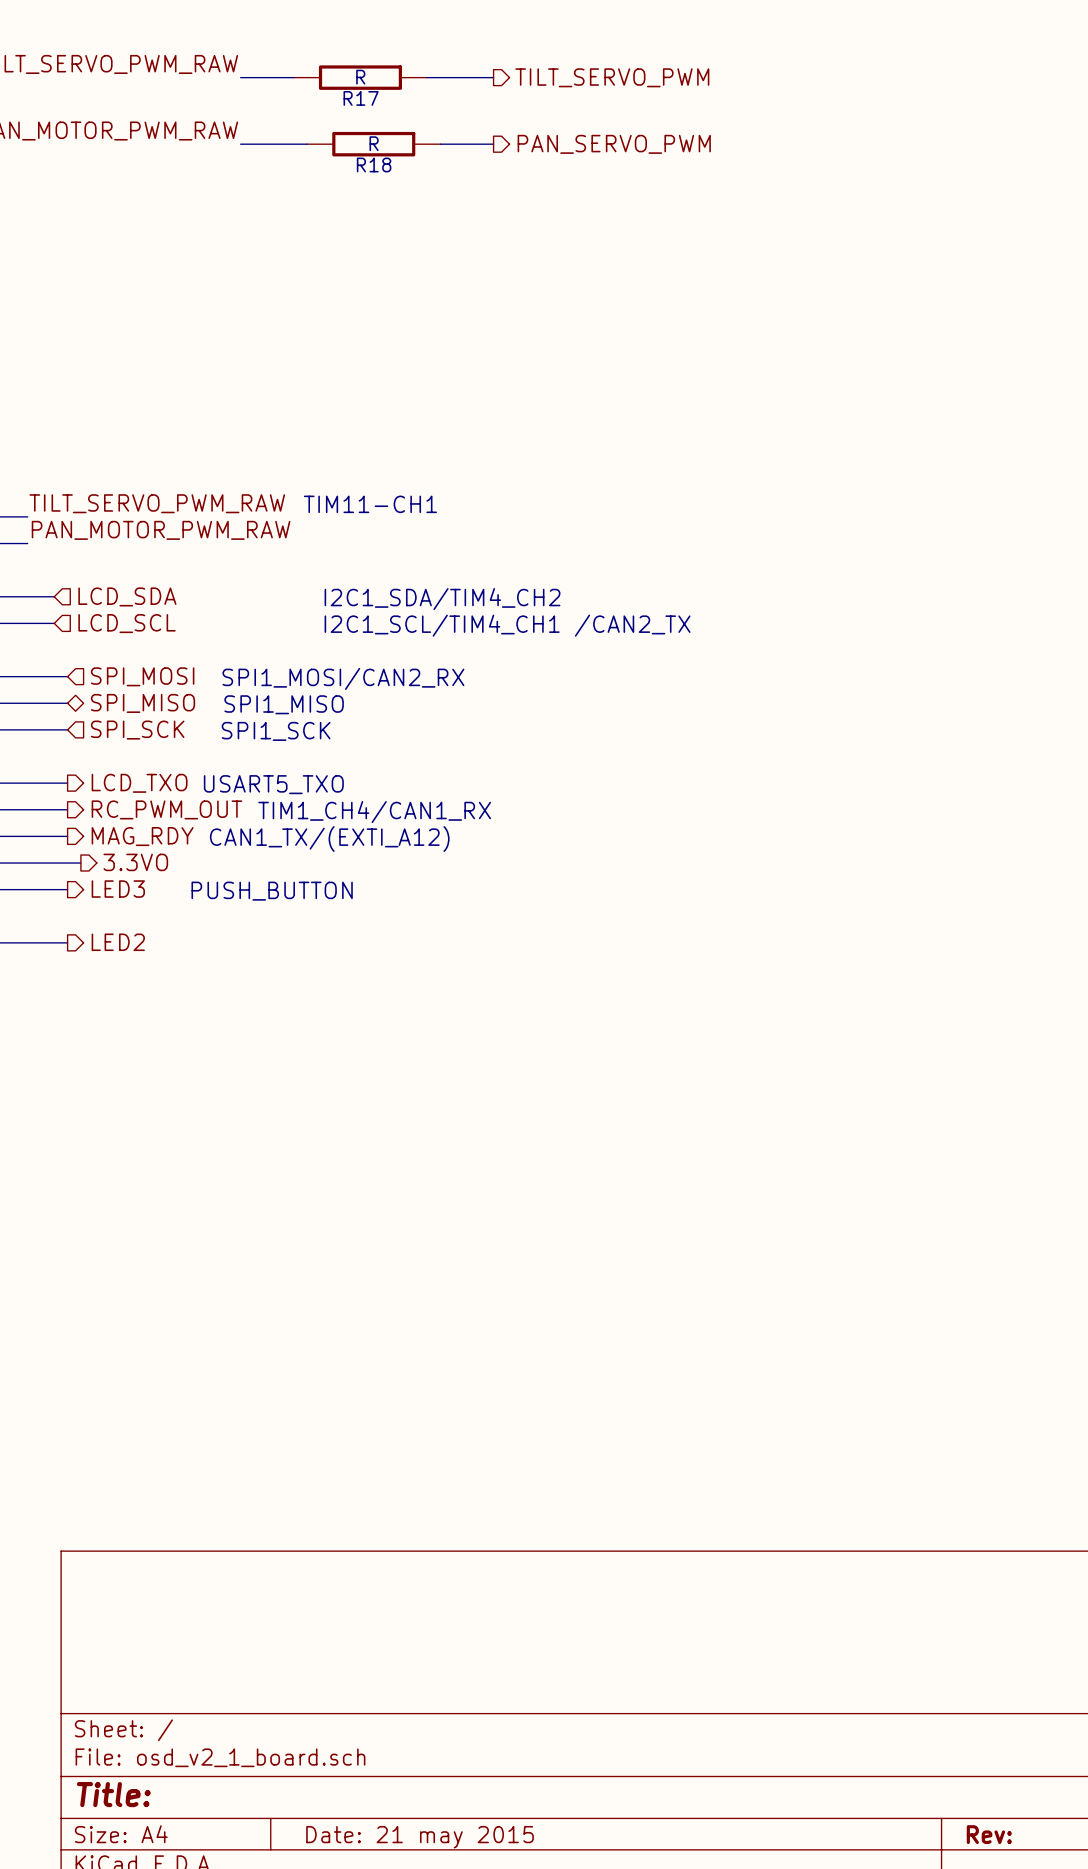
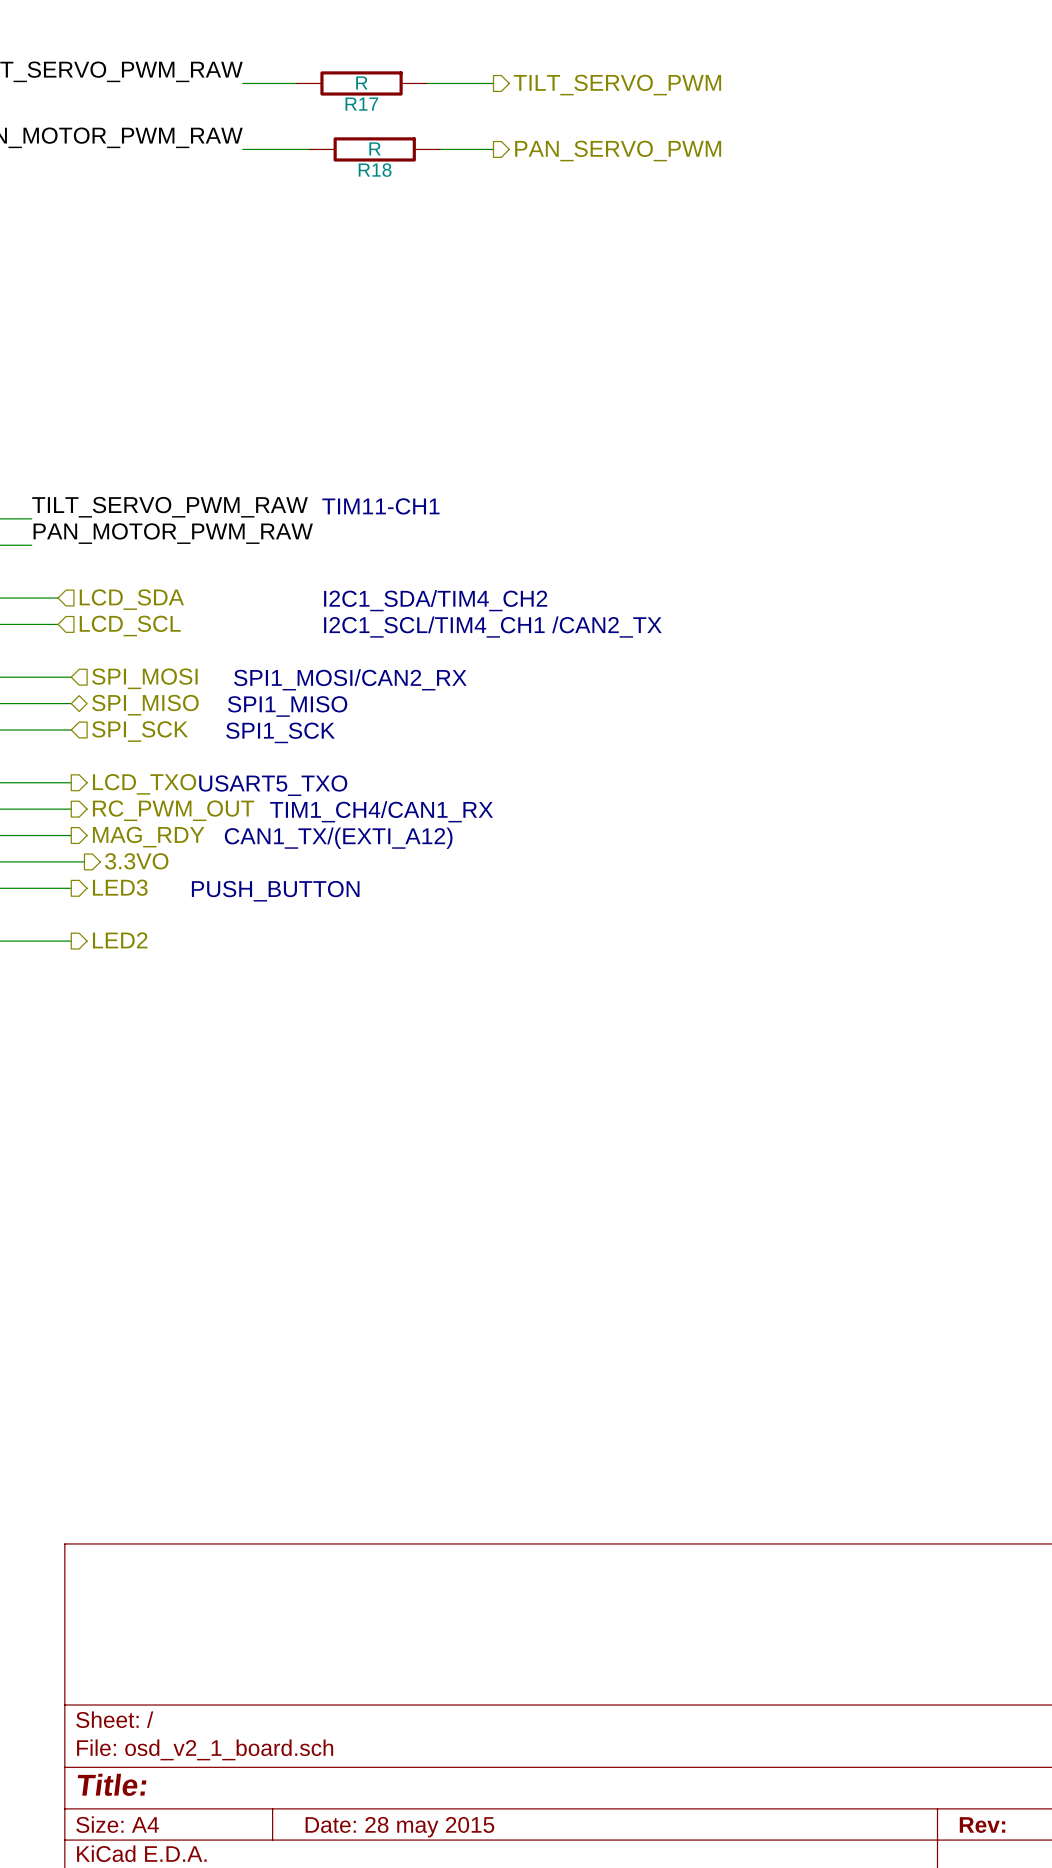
title block: Date: 21 may 2015 (420, 1837) -> Date: 28 may 2015 (399, 1827)

